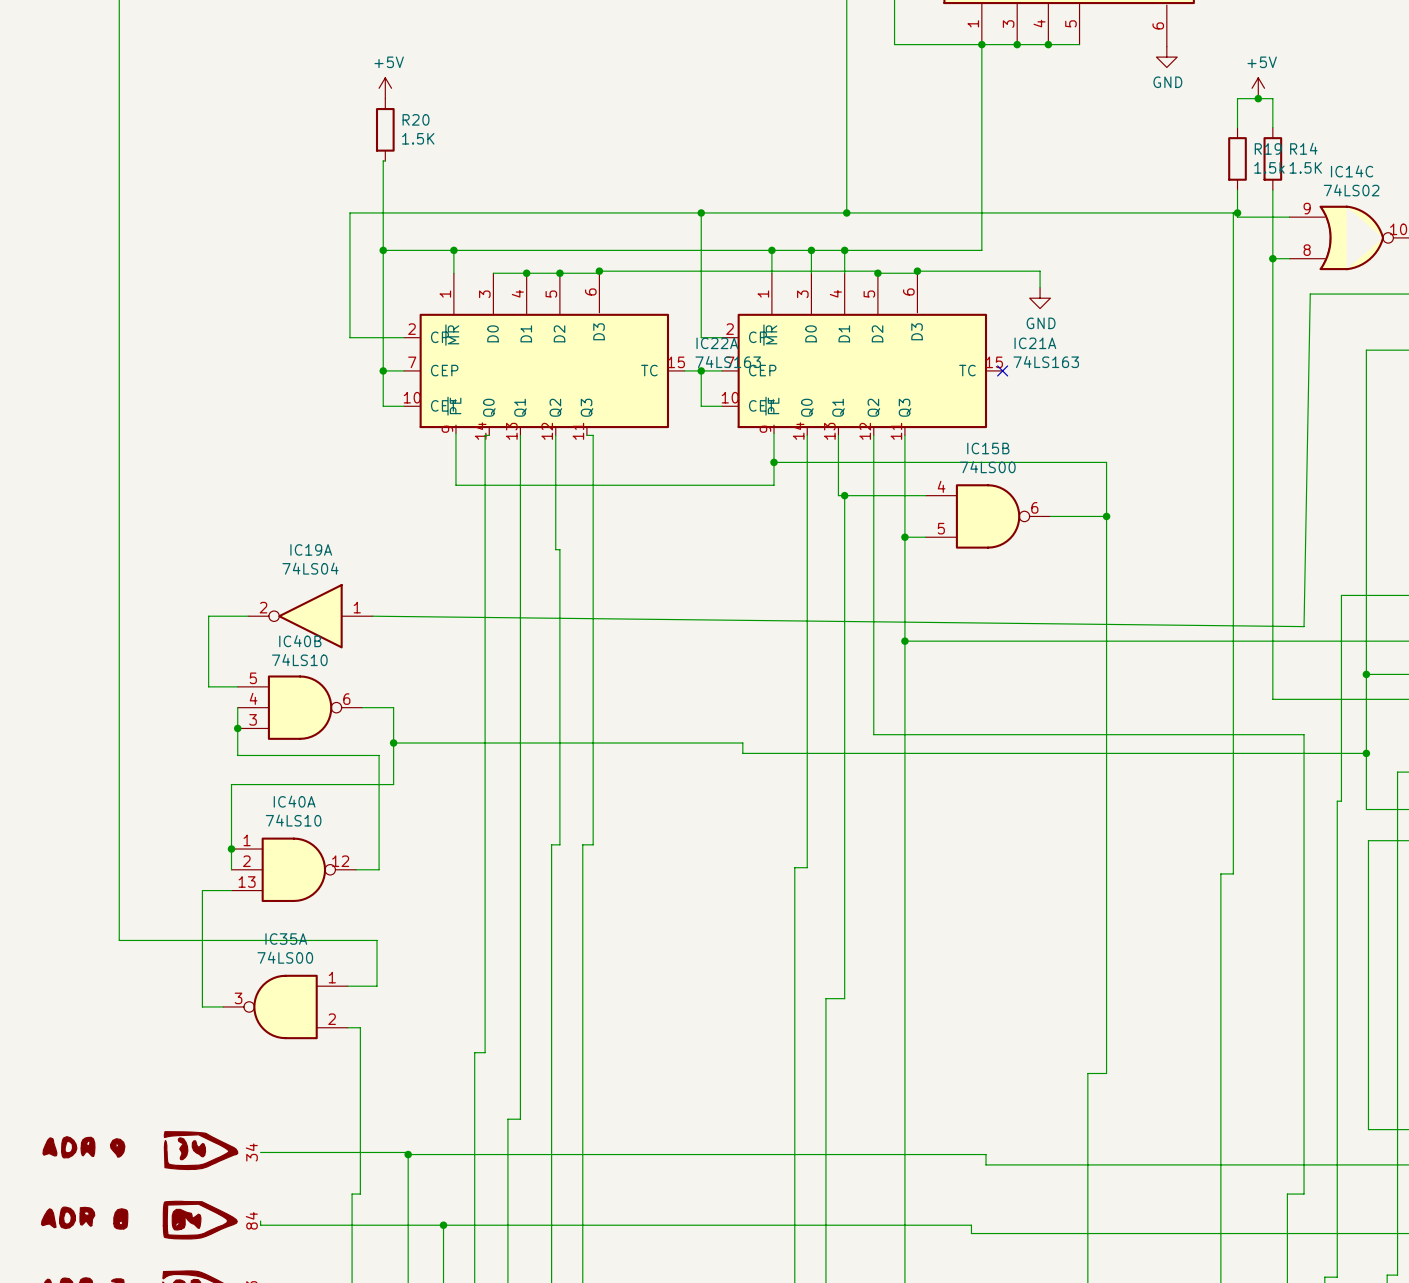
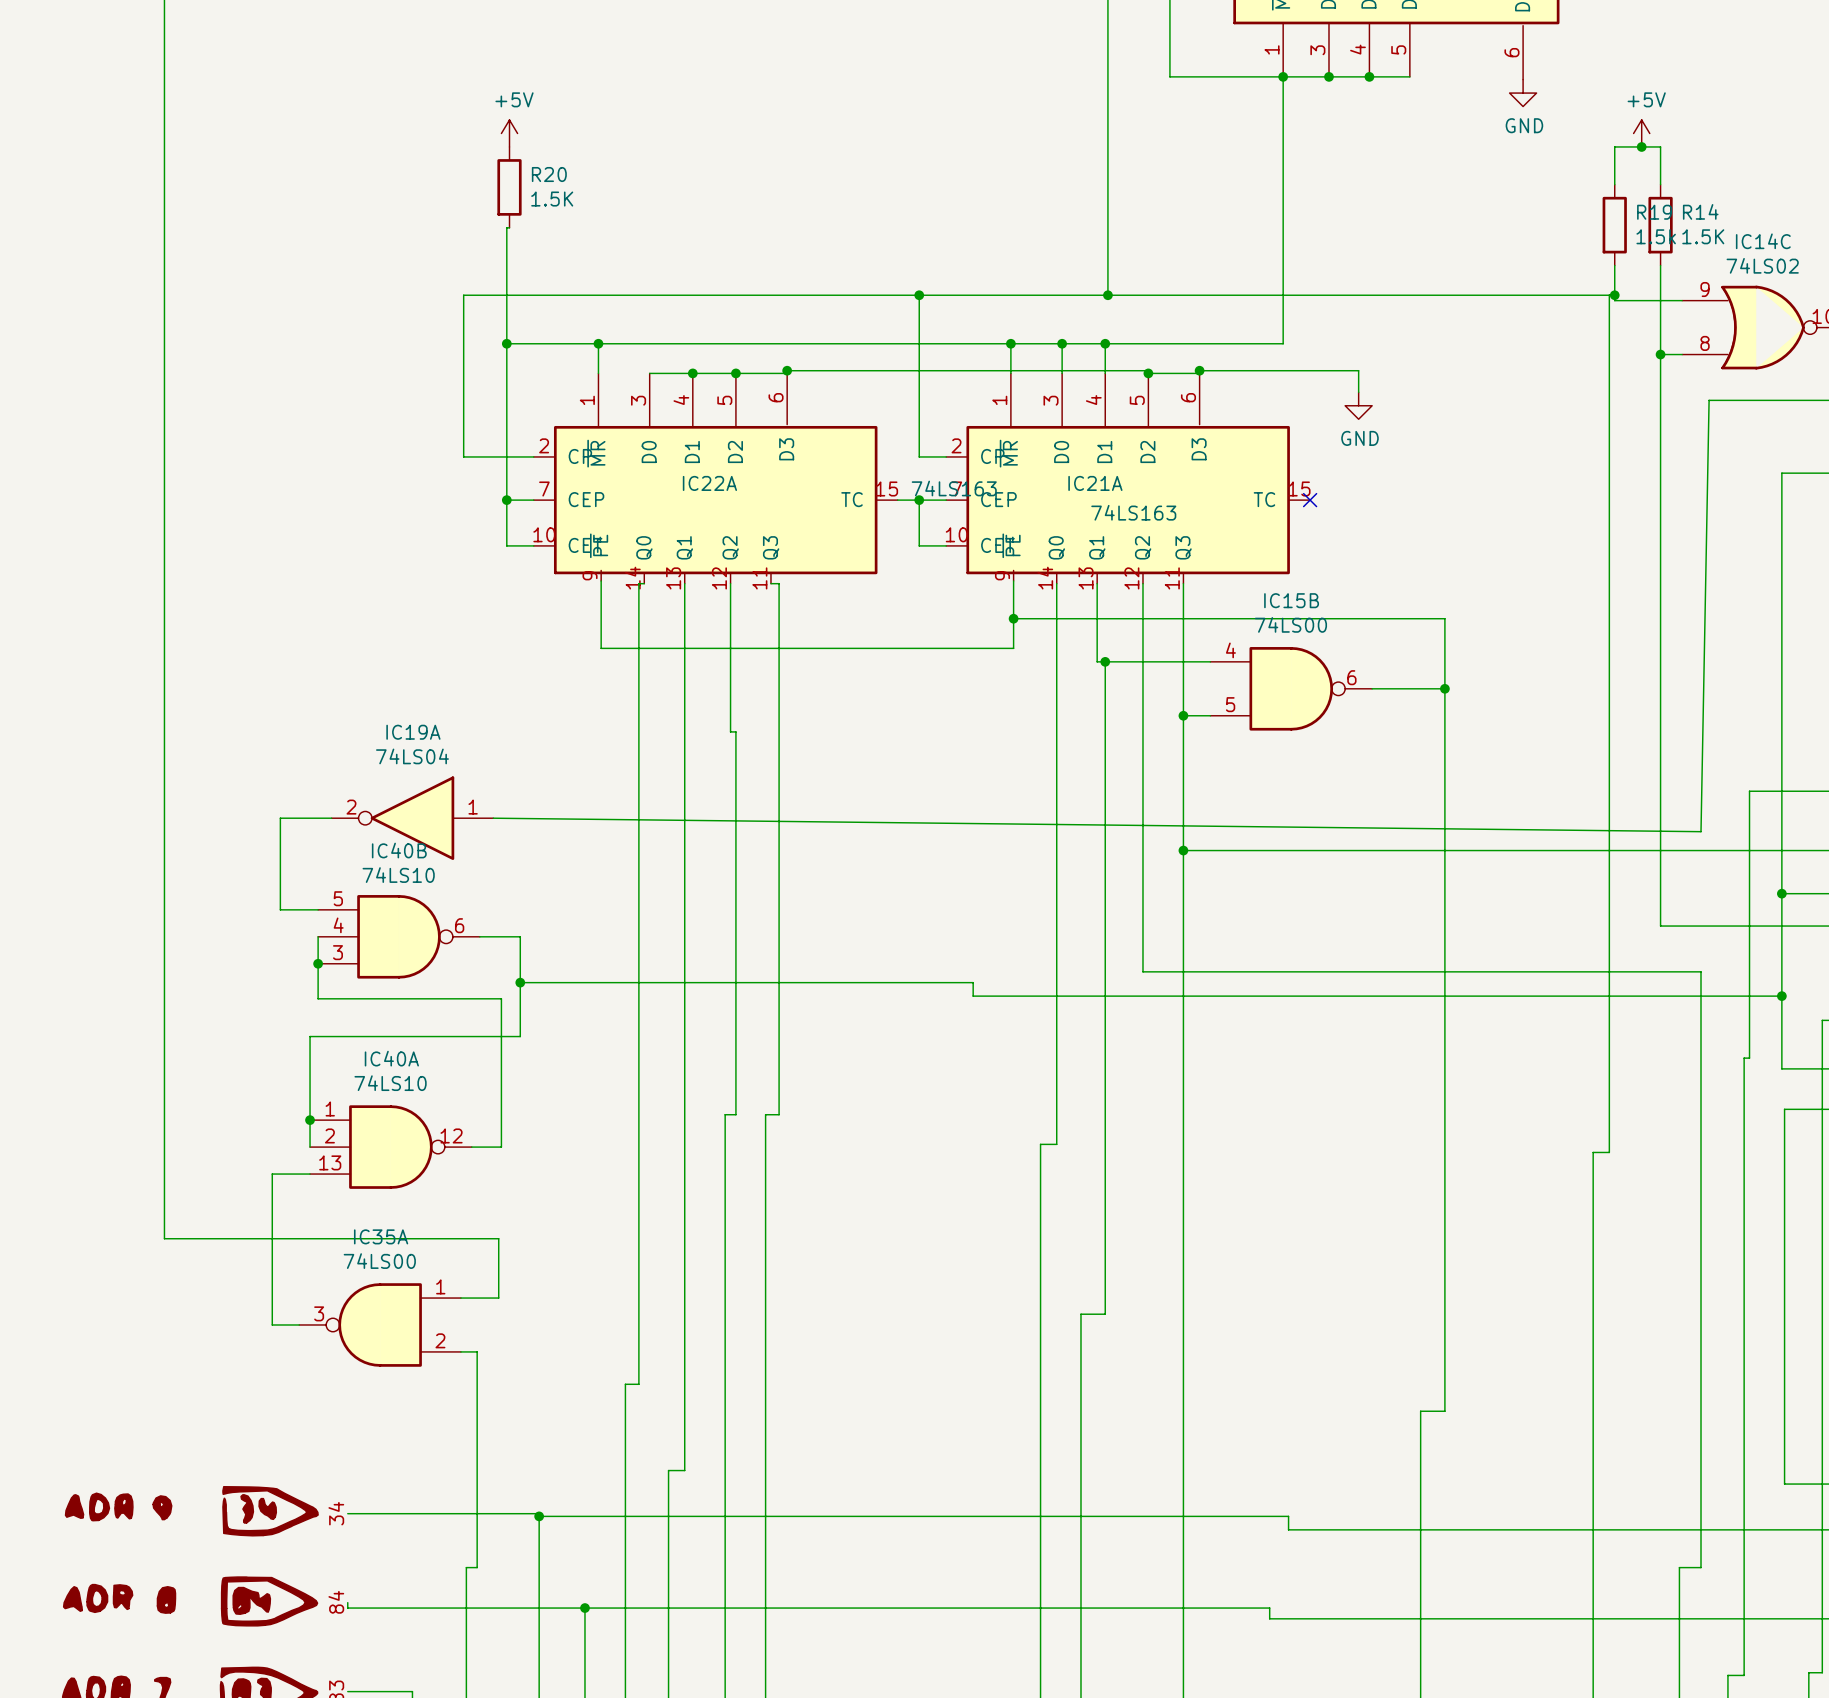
IC22A name position: IC22A (717, 343) -> IC22A (709, 483)
IC21A name position: IC21A (1035, 343) -> IC21A (1095, 483)
IC21A value position: 74LS163 (1046, 361) -> 74LS163 (1133, 512)

